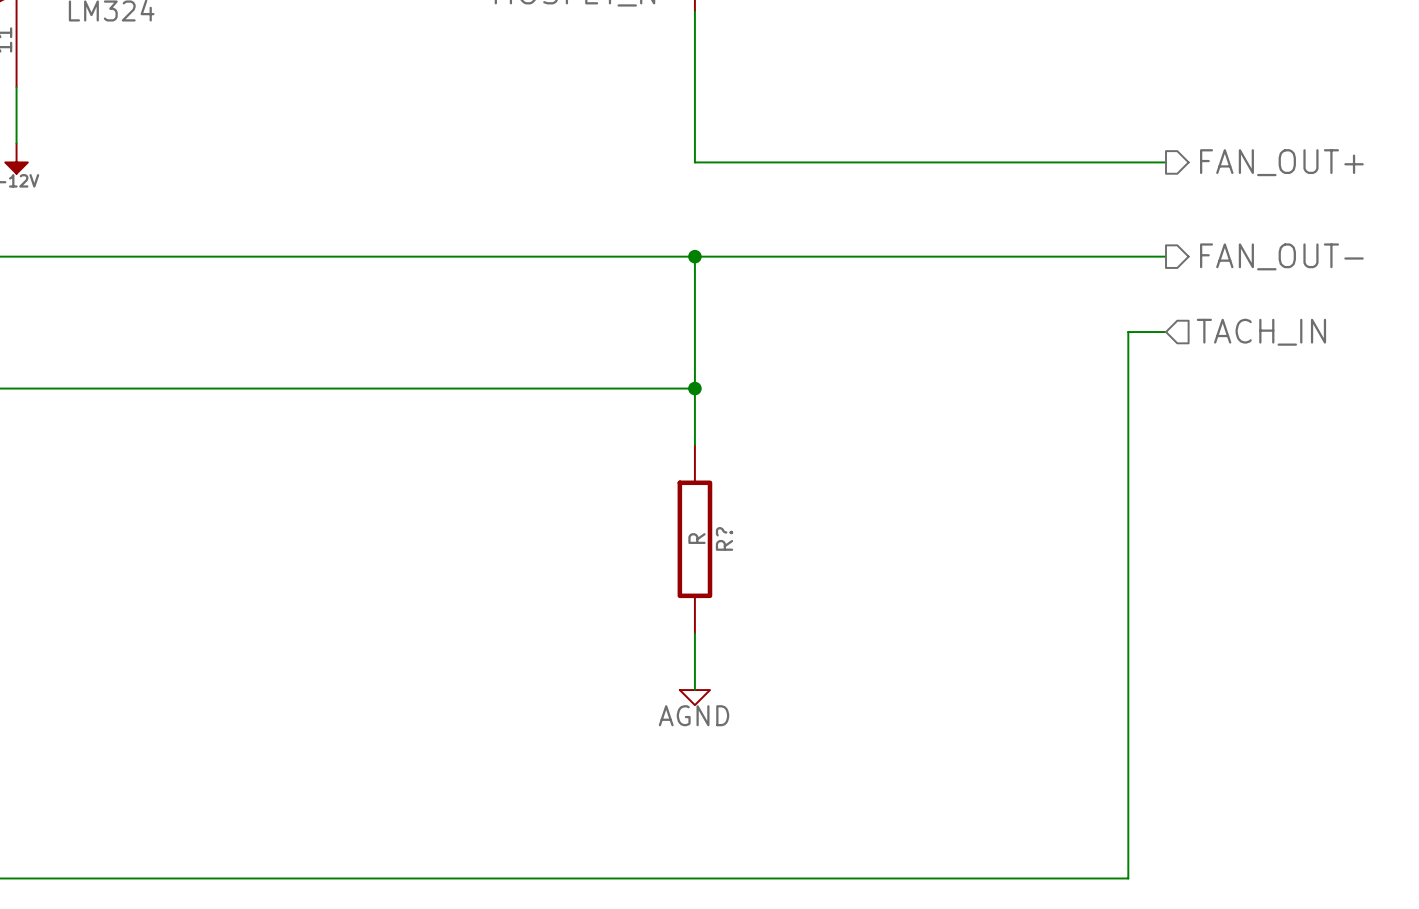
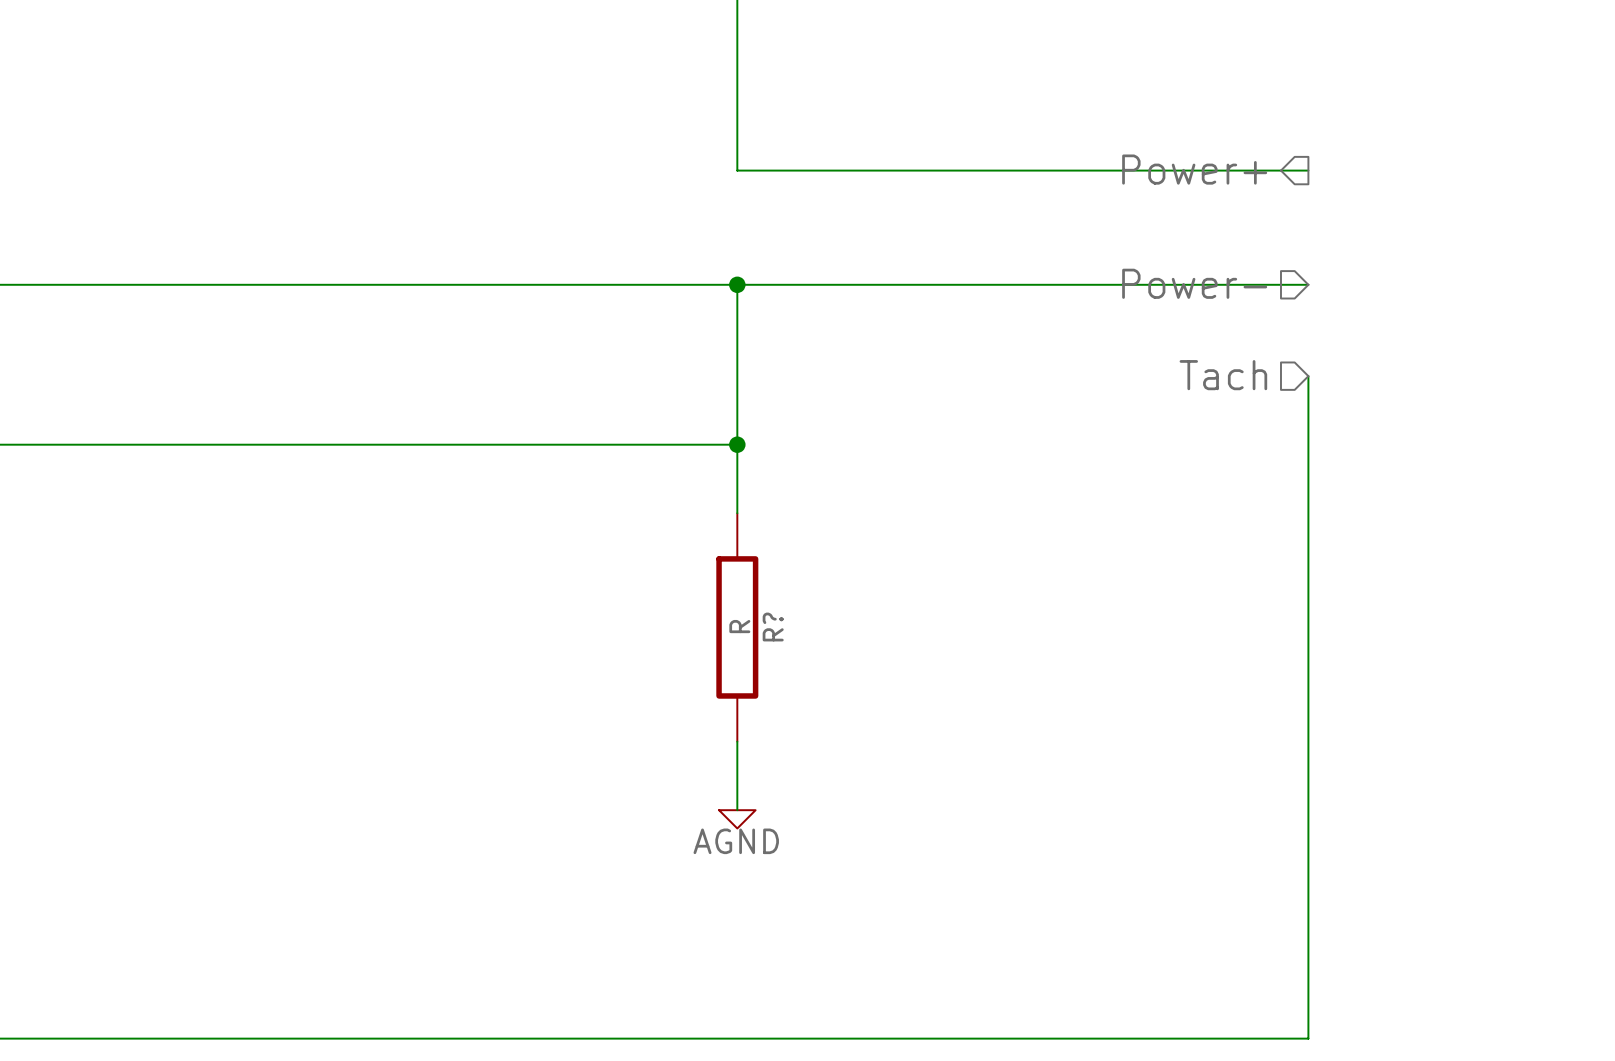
hierarchical label: none -> Power+ (1194, 169)
hierarchical label: FAN_OUT+ (1281, 162) -> none
hierarchical label: none -> Power- (1194, 283)
hierarchical label: FAN_OUT- (1281, 256) -> none
hierarchical label: none -> Tach (1223, 375)
wire: (1166, 332) (1128, 332) (1128, 878) -> (1308, 376) (1308, 1038) (1262, 1038)
hierarchical label: TACH_IN (1261, 332) -> none

